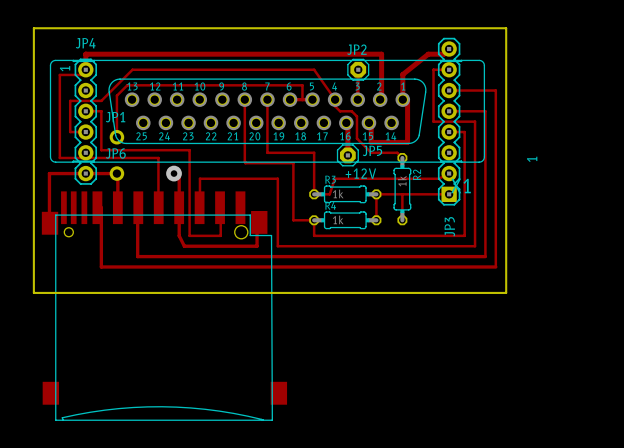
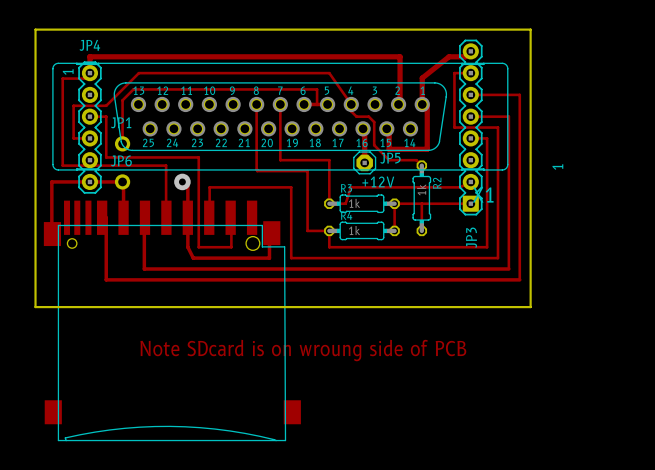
track: (358, 69) (357, 99) -> none
JP2: (358, 69) -> none
text: none -> Note SDcard is on wroung side of PCB (303, 350)

